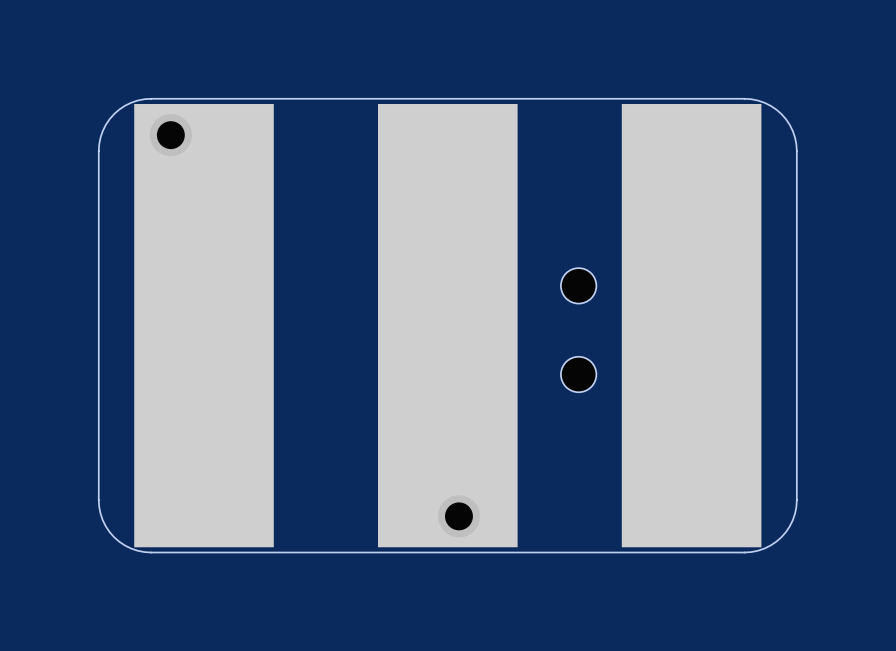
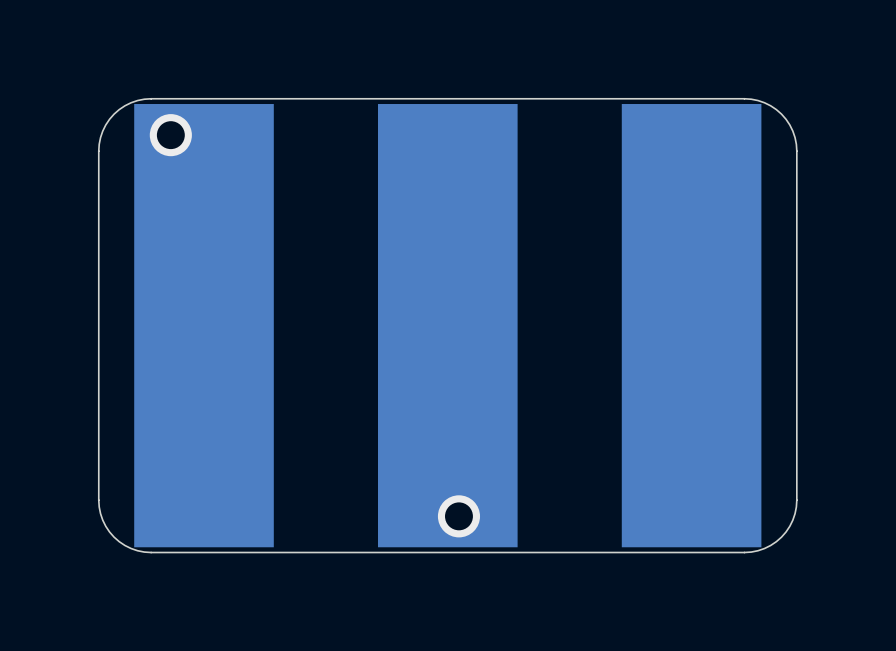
part: (578, 330) -> none

